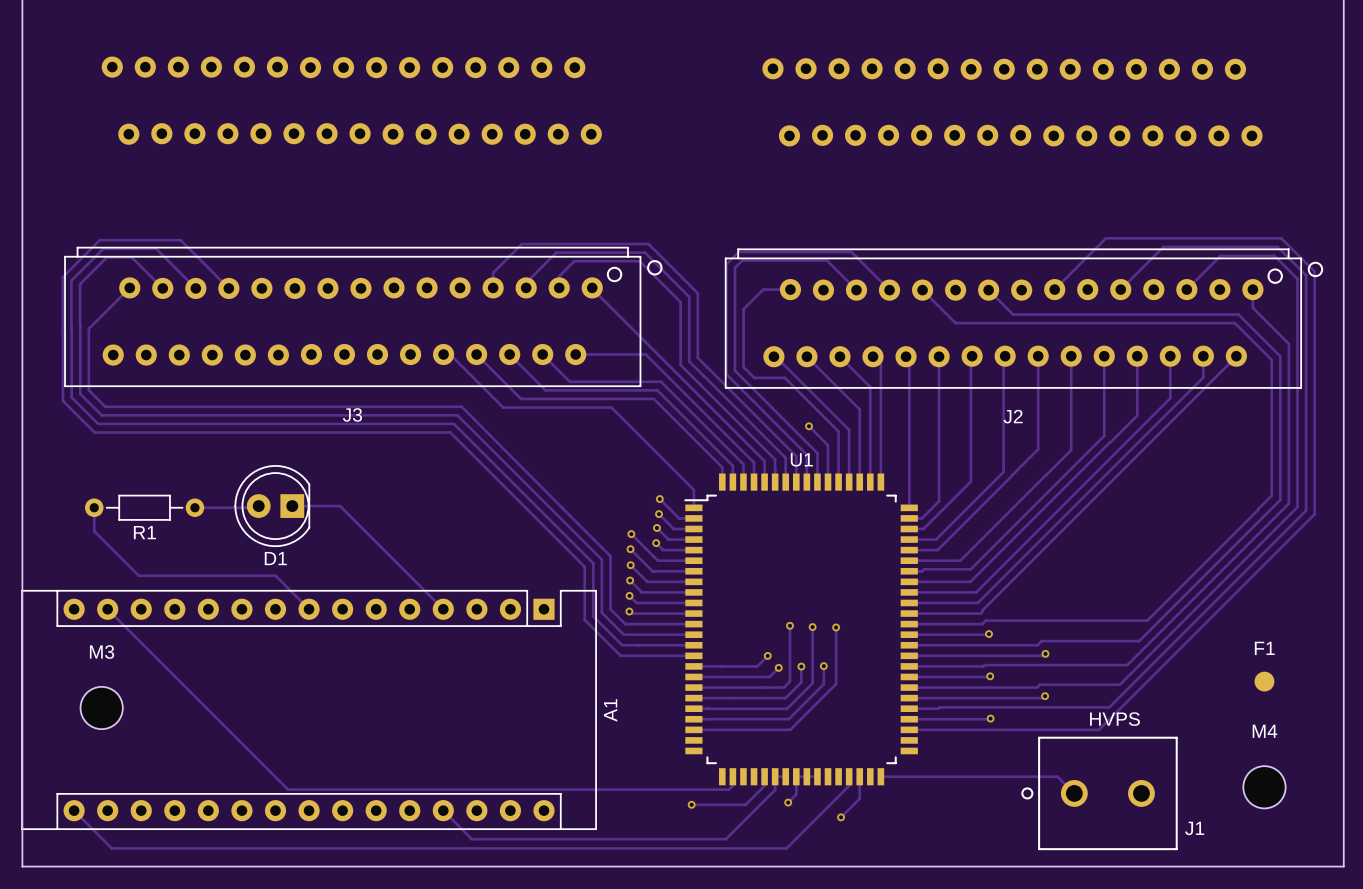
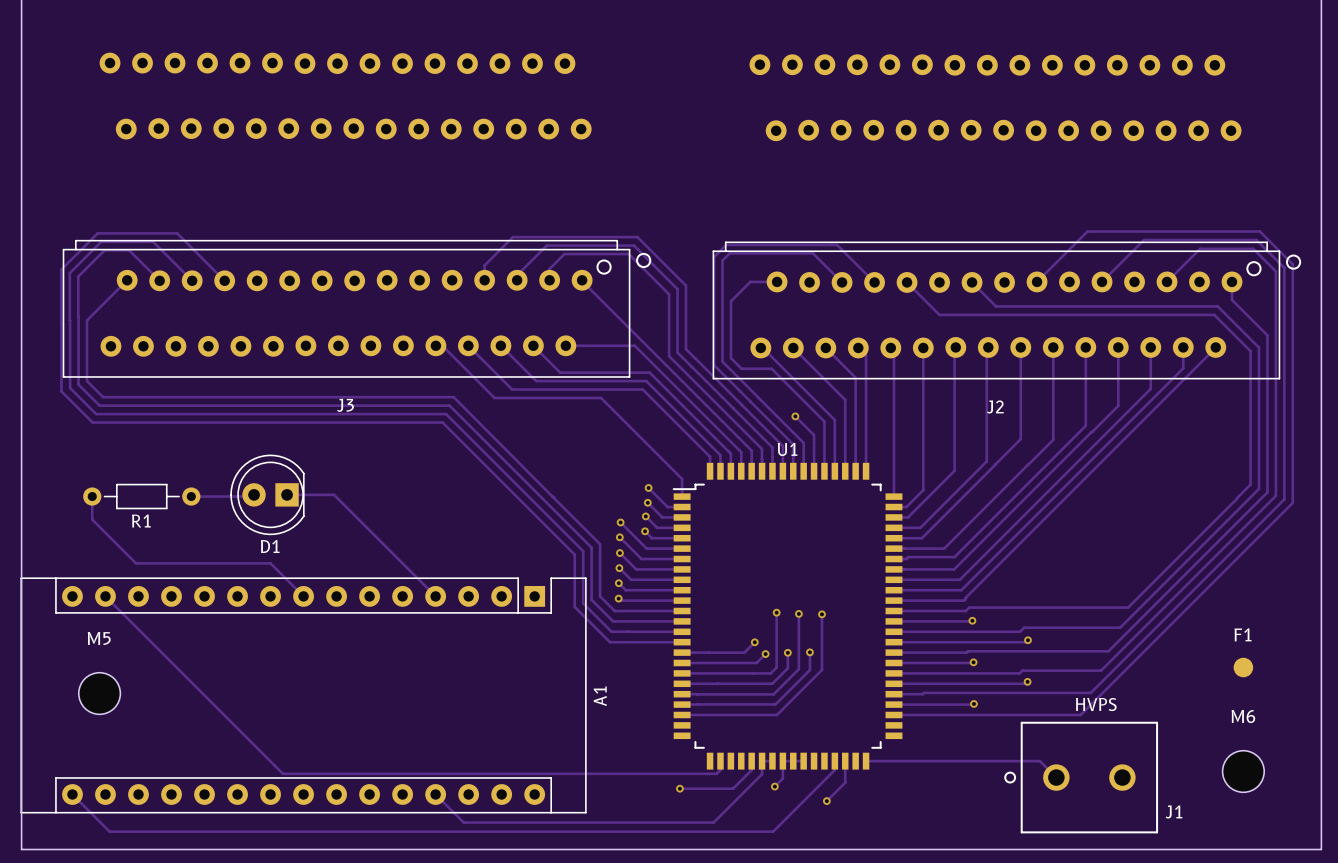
M3 name: M3 (102, 652) -> M5 (99, 638)
M4 name: M4 (1264, 731) -> M6 (1243, 716)

